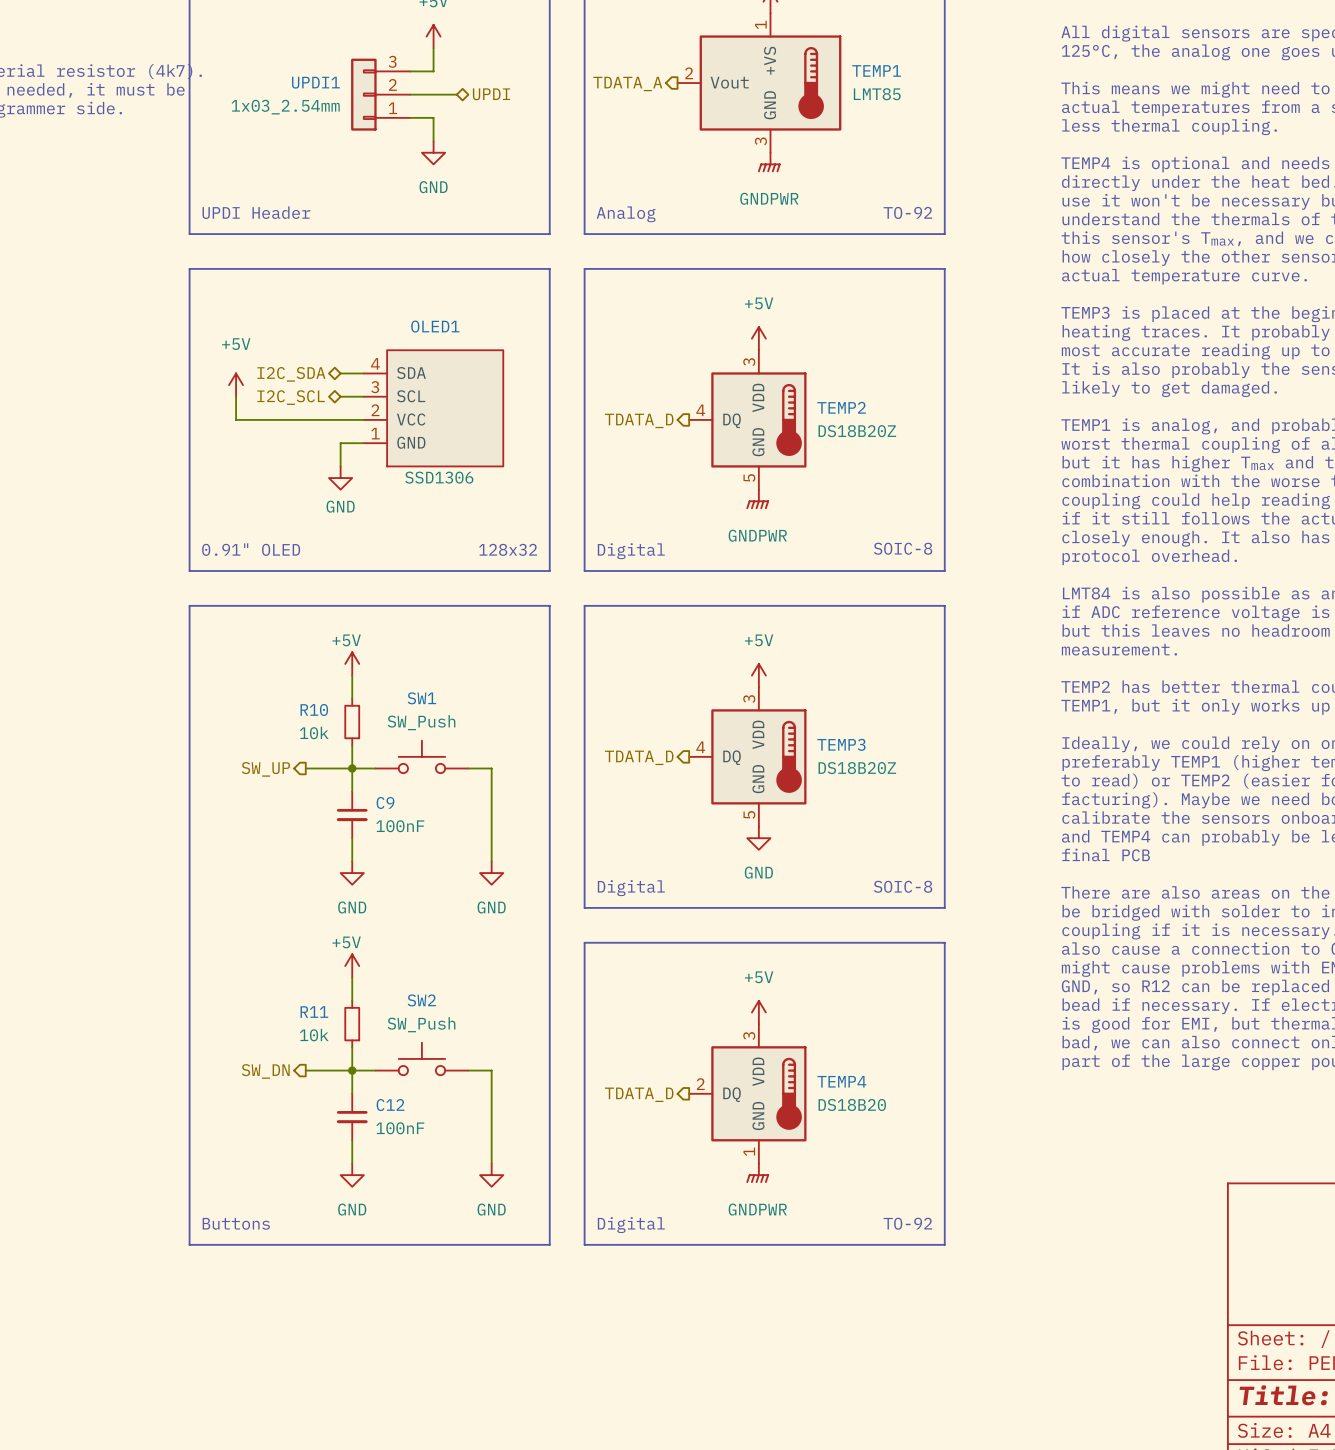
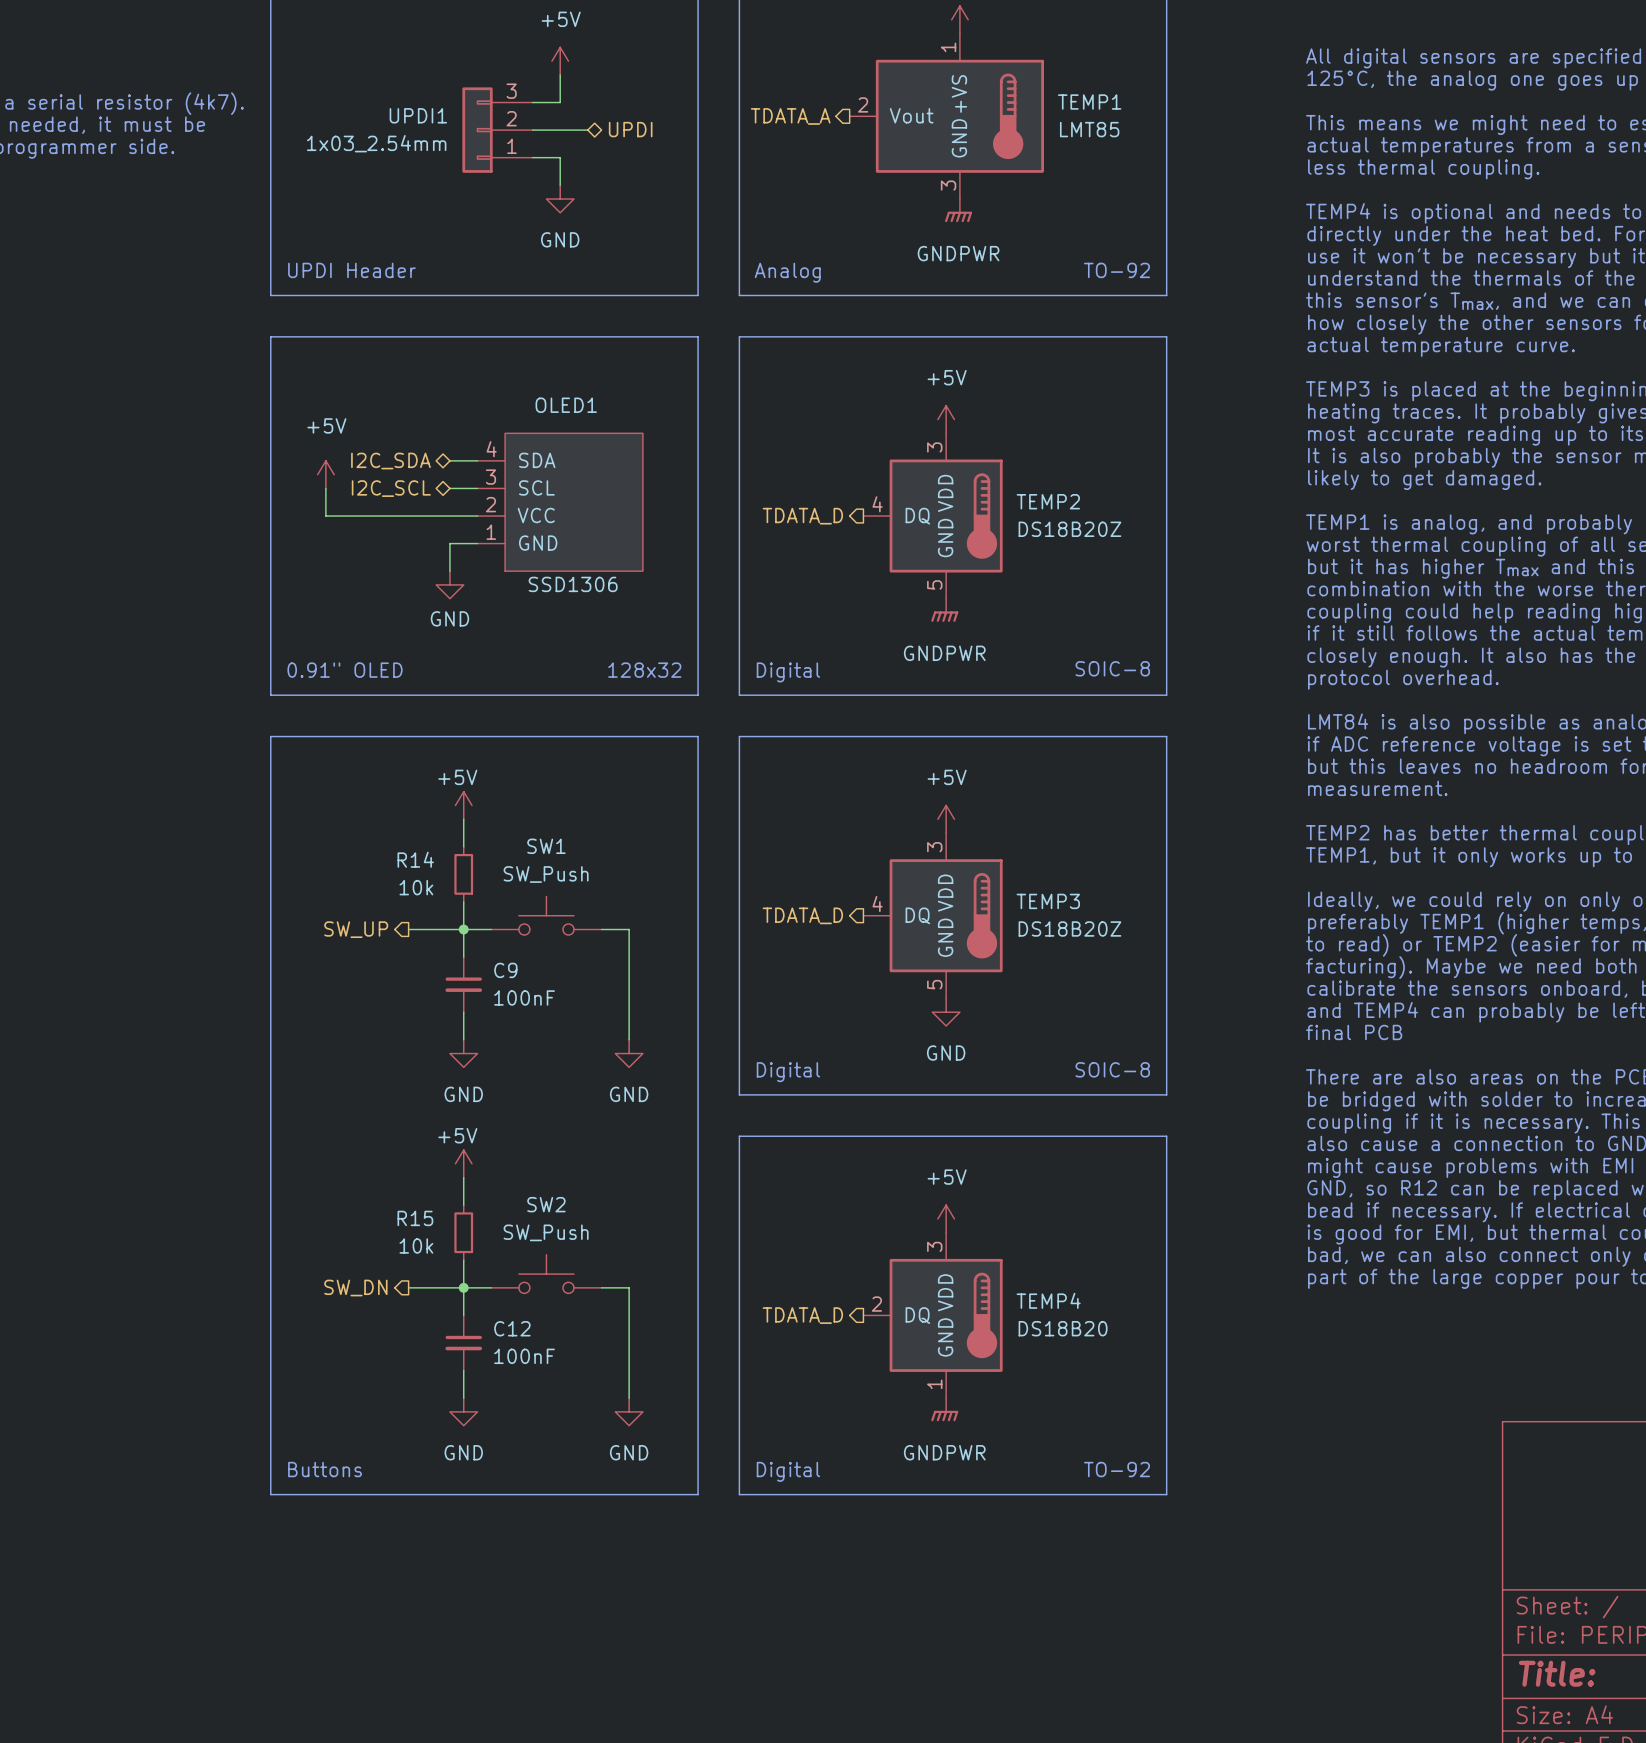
R10 name: R10 (314, 709) -> R14 (415, 859)
R11 name: R11 (314, 1012) -> R15 (415, 1218)

